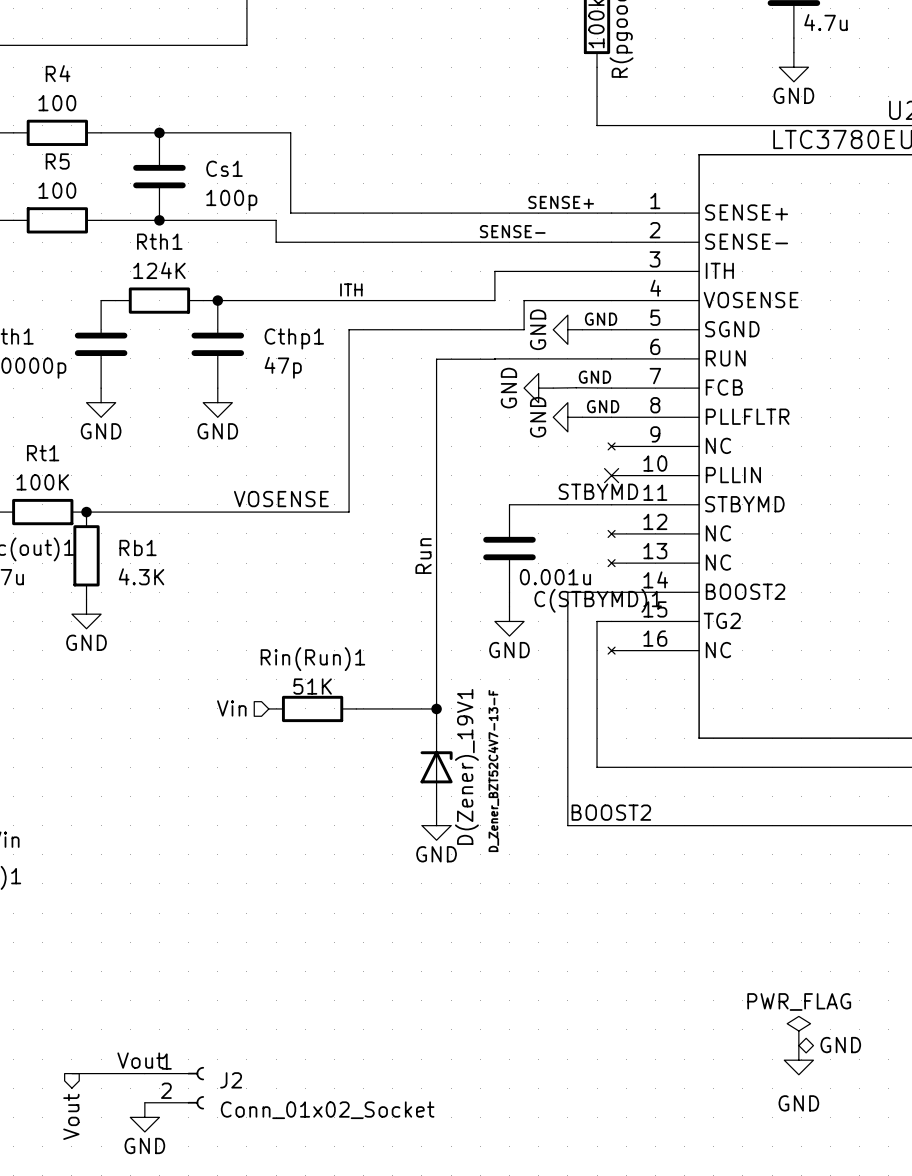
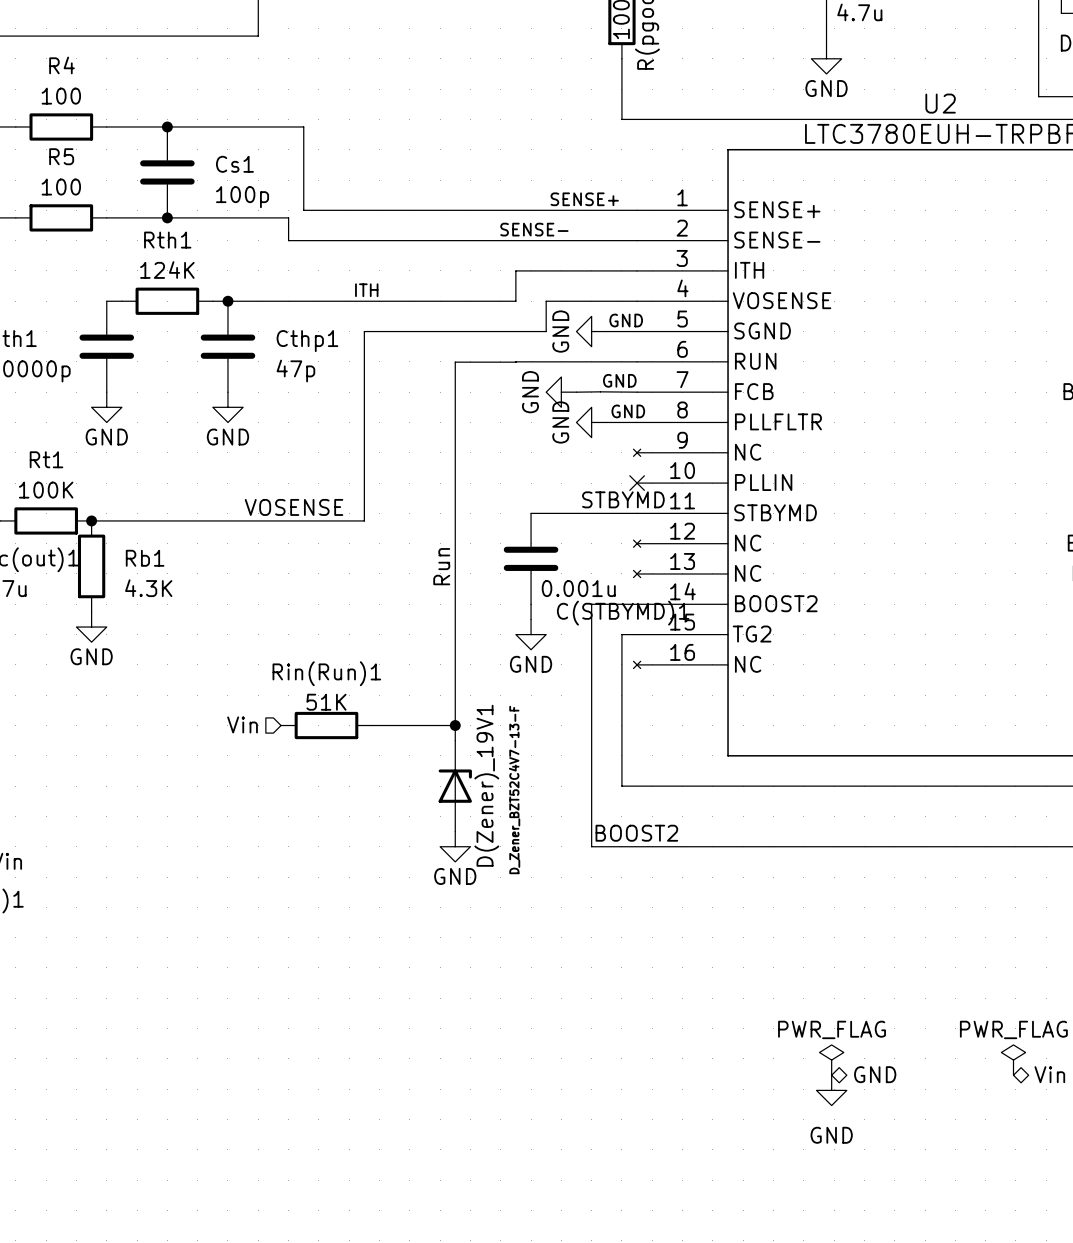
label: Vout (140, 1060) -> none
wire: (71, 1073) (144, 1073) -> none
J2: Conn_01x02_Socket (174, 1088) -> none
hierarchical label: Vout (71, 1116) -> none
power symbol: GND (144, 1117) -> none

